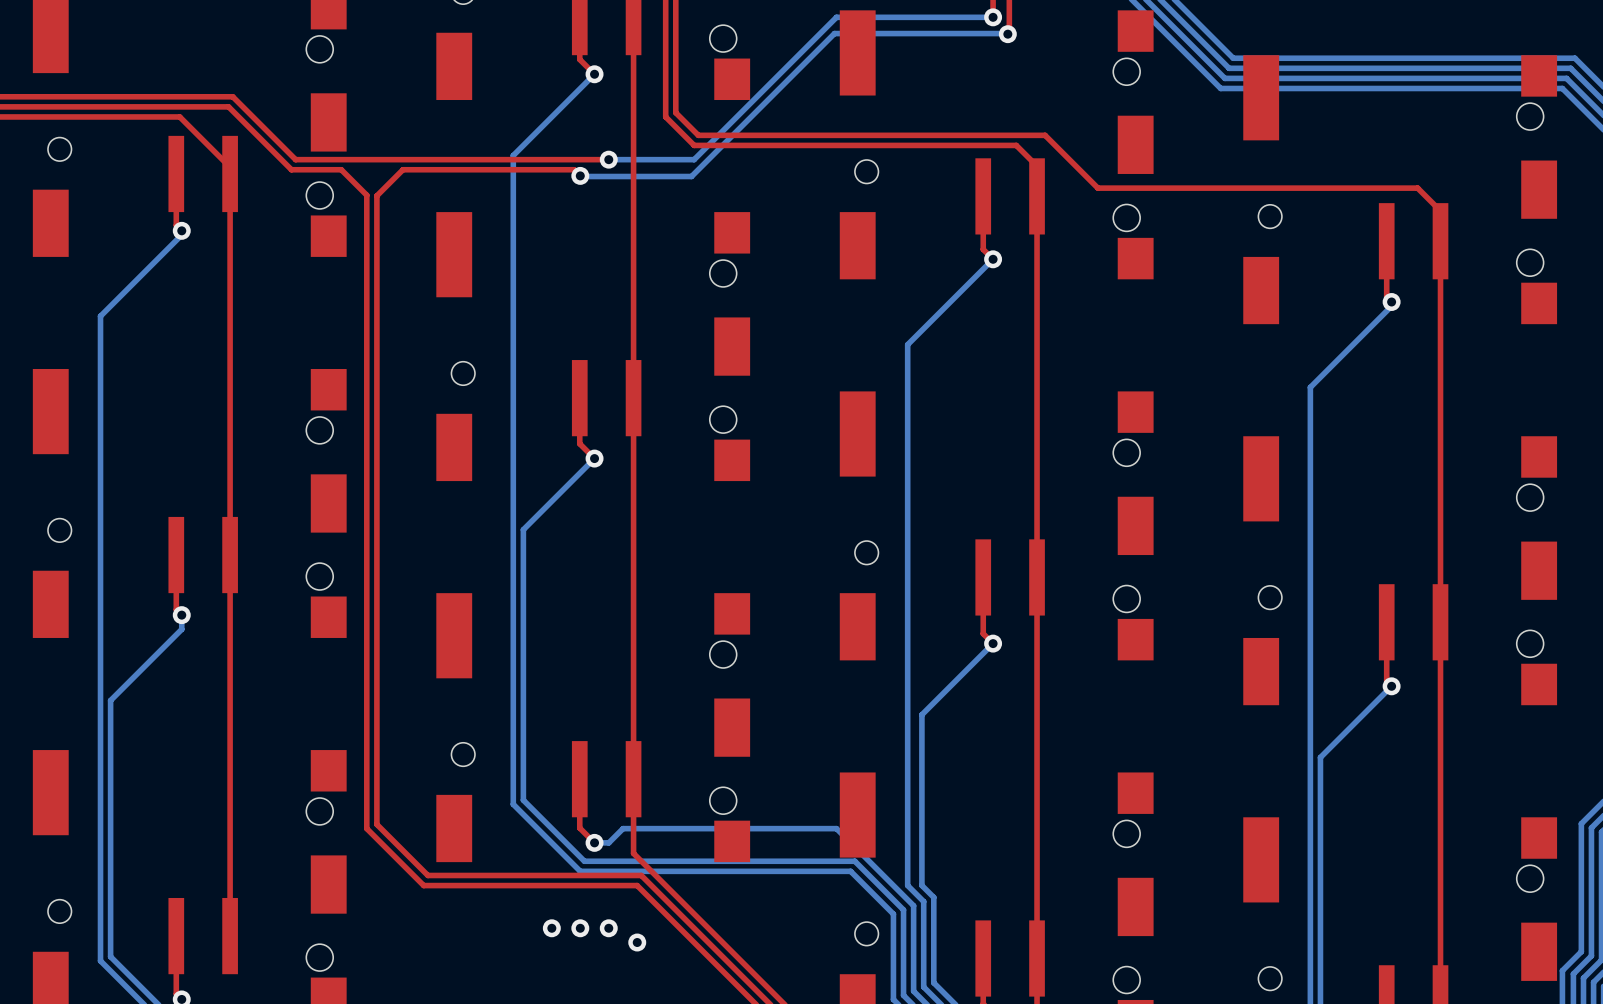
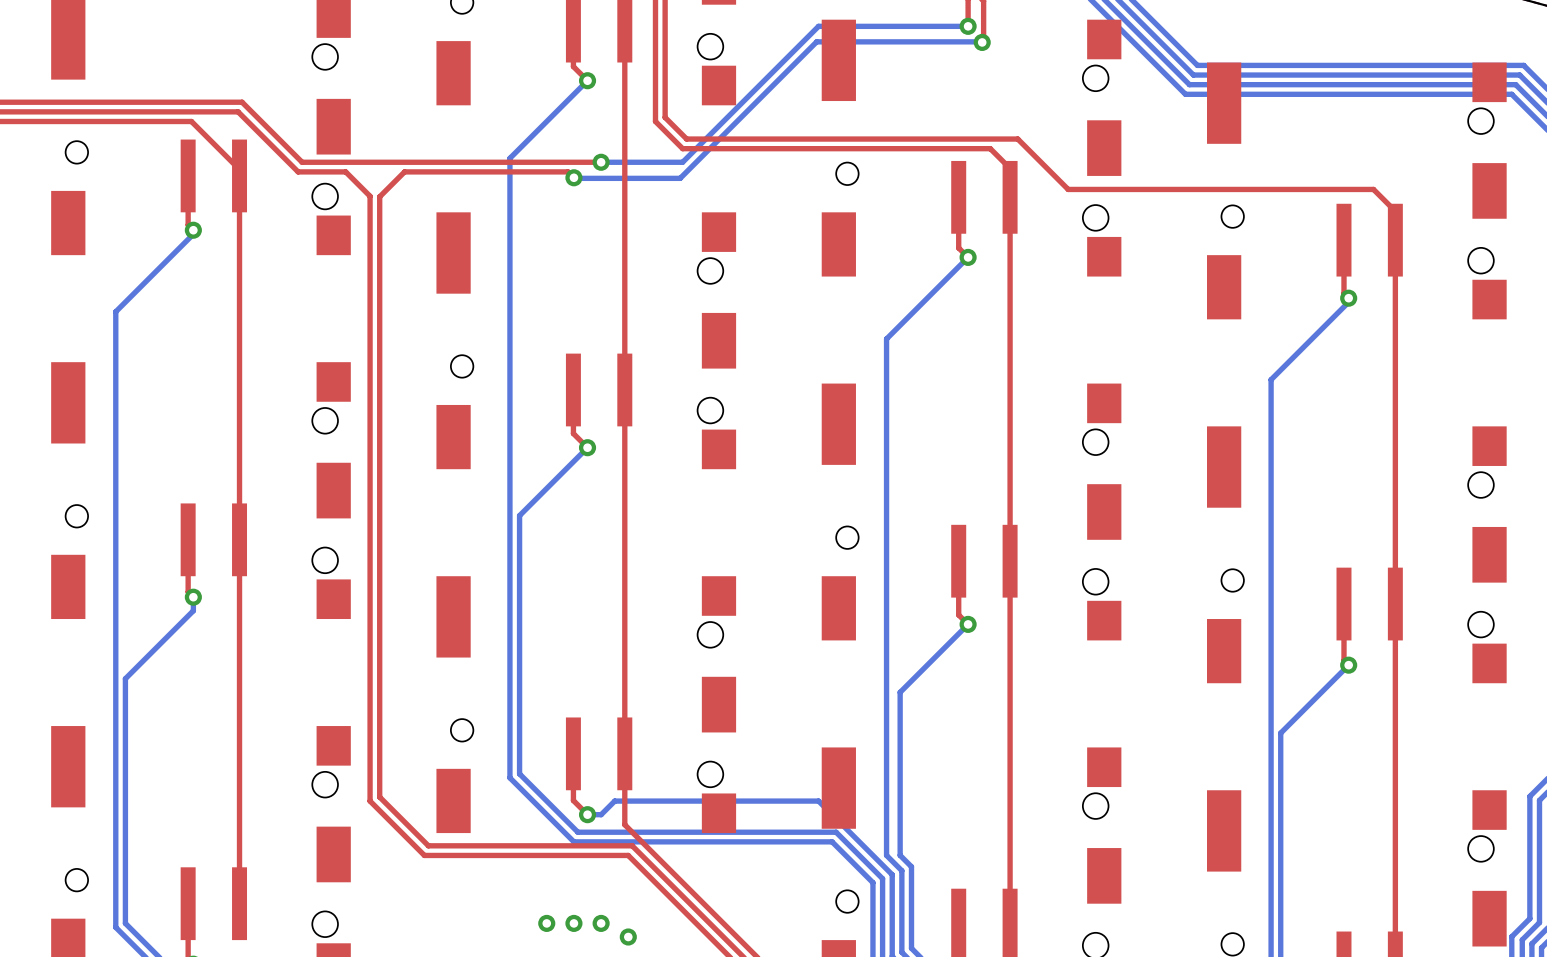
via: (551, 928) -> none
via: (580, 928) -> none
via: (608, 928) -> none
via: (637, 942) -> none
via: none -> (546, 923)
via: none -> (573, 923)
via: none -> (601, 923)
via: none -> (628, 937)

